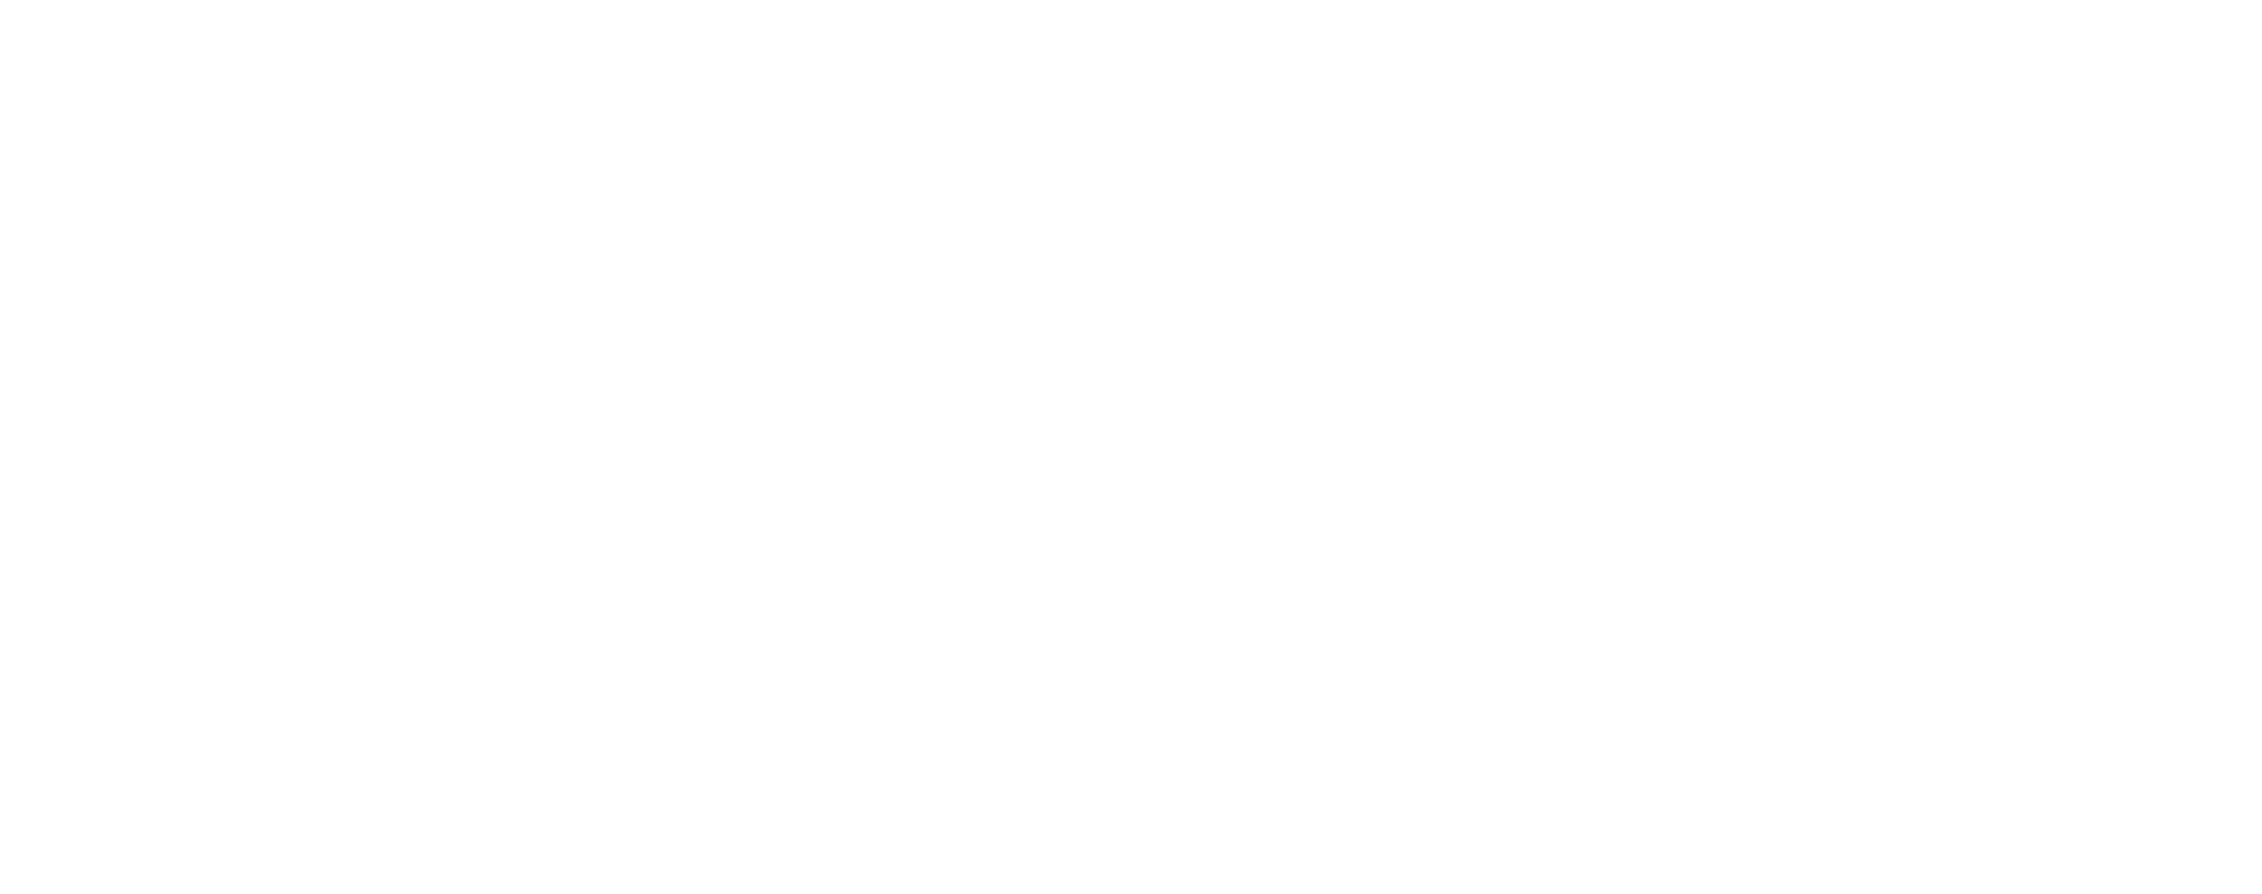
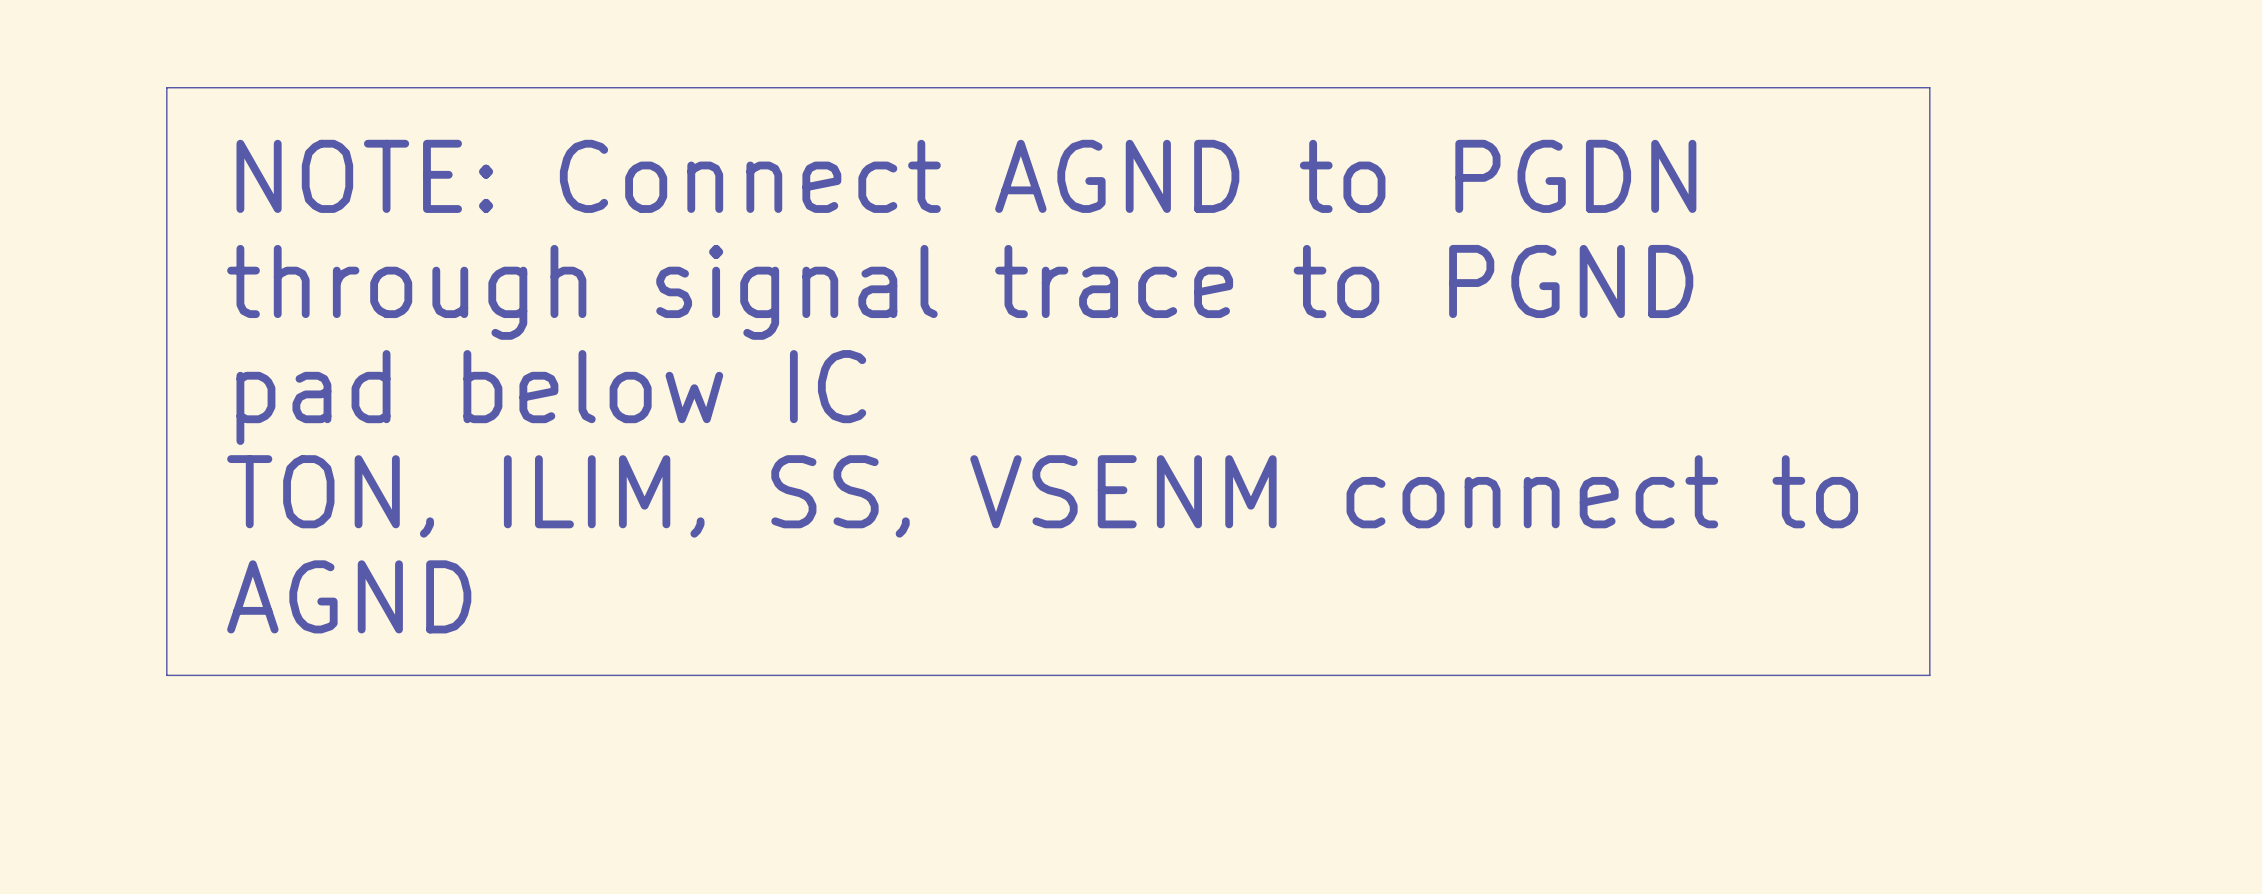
line: none -> (166, 87) (1929, 87) (1929, 675) (166, 675) (166, 87)
text: none -> NOTE: Connect AGND to PGDN (966, 176)
text: none -> through signal trace to PGND (960, 292)
text: none -> pad below IC (551, 397)
text: none -> TON, ILIM, SS, VSENM connect to (1042, 496)
text: none -> AGND (349, 596)

